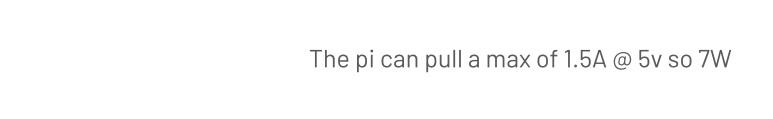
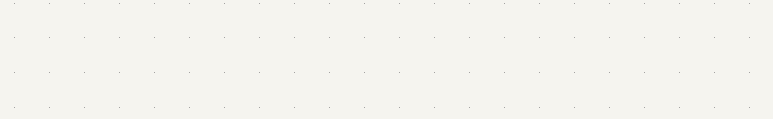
text: The pi can pull a max of 1.5A @ 5v so 7W (520, 60) -> none

